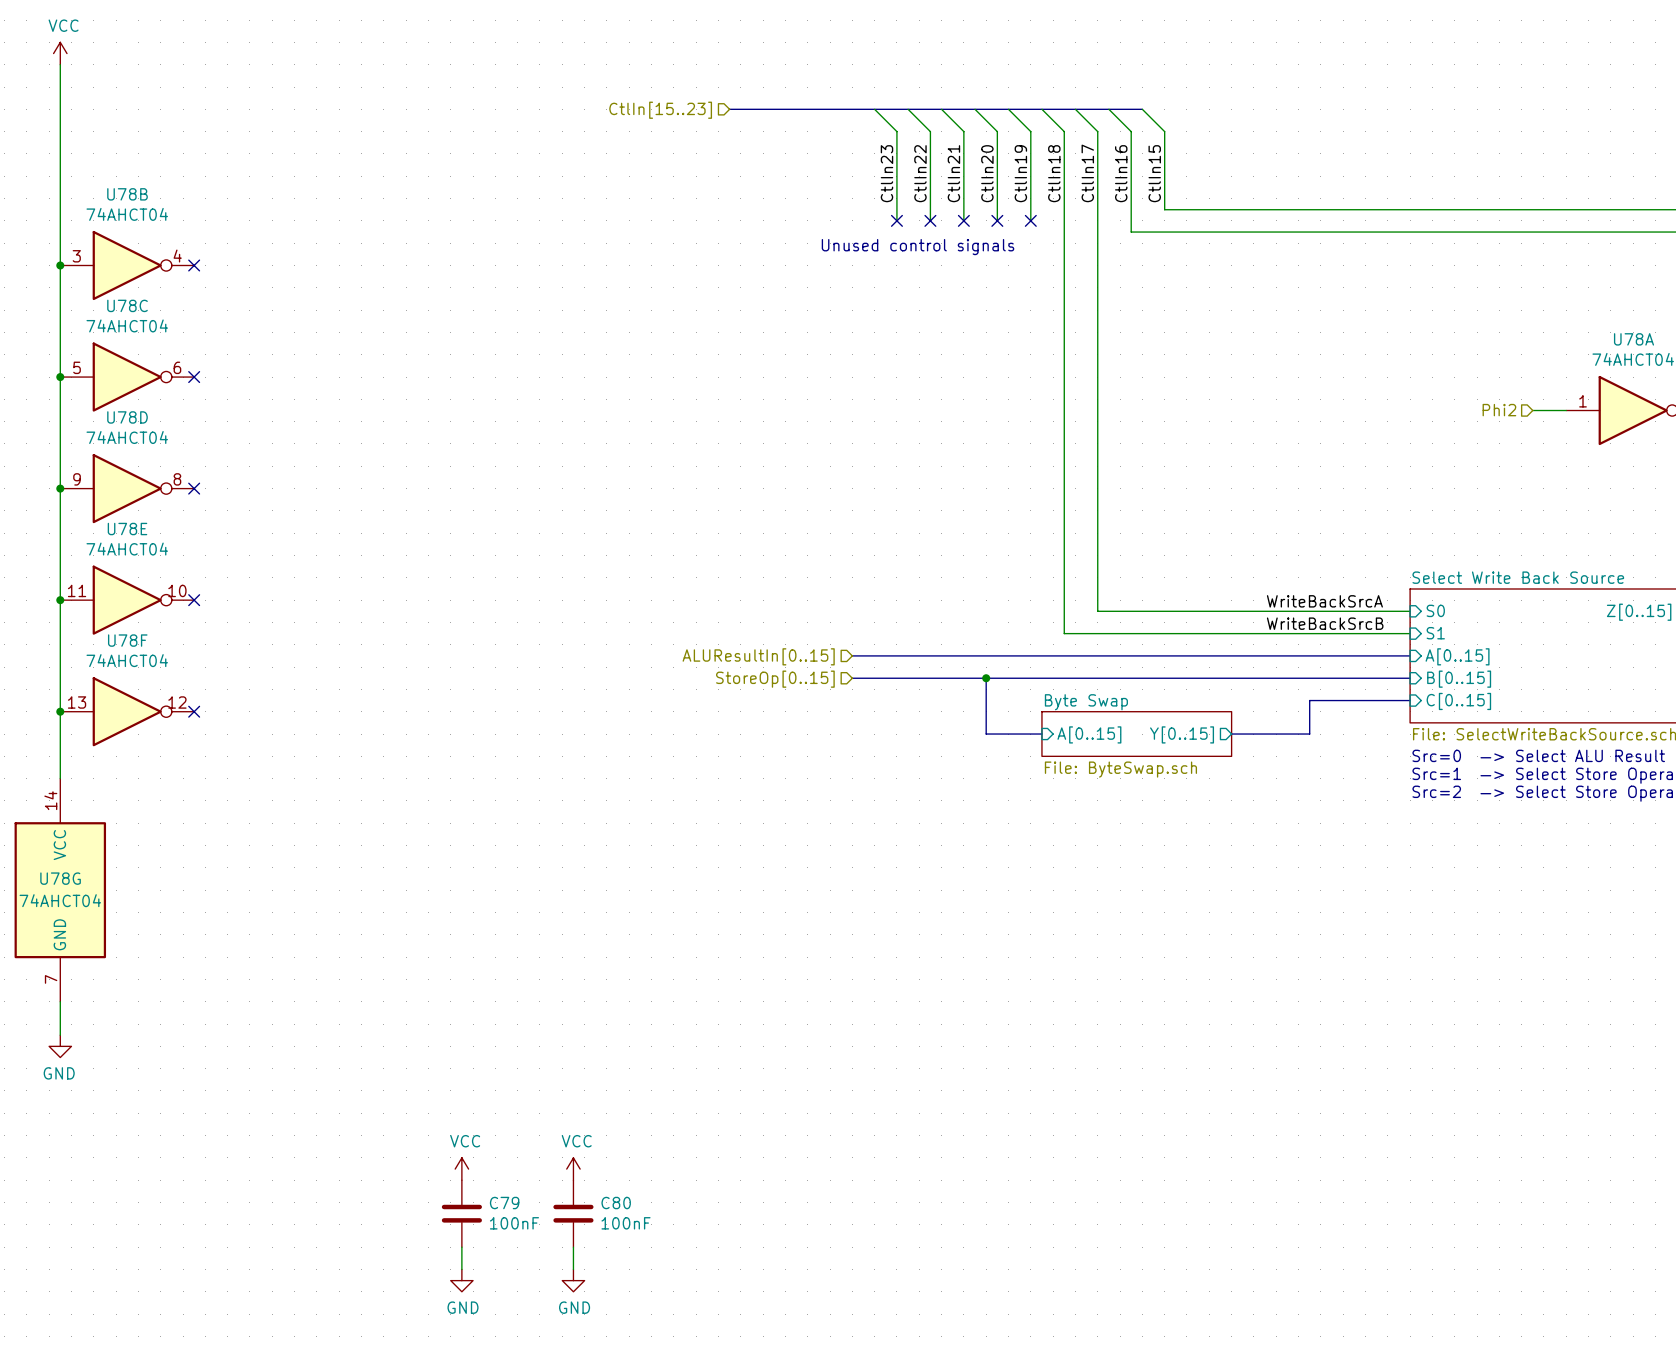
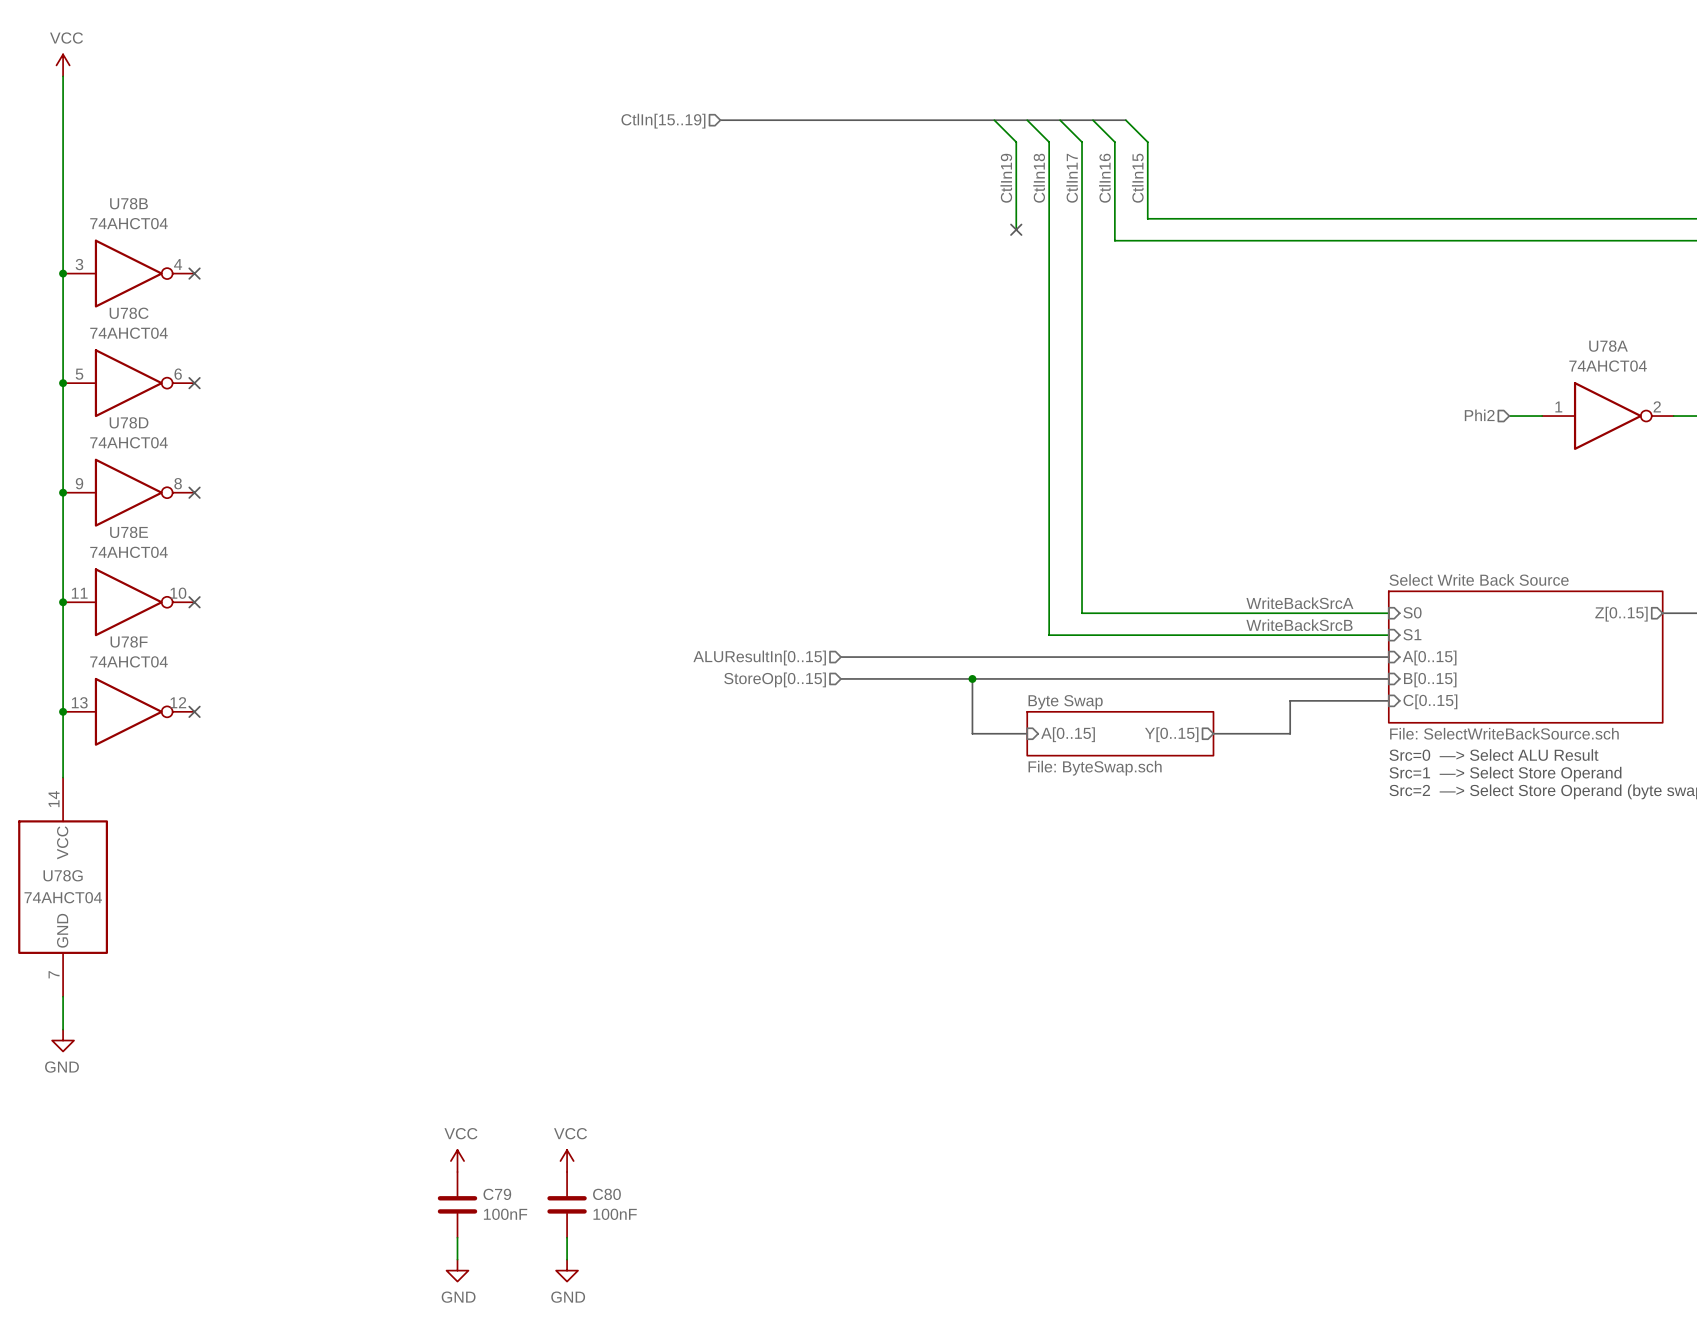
wire: (874, 109) (896, 131) (896, 220) -> none
wire: (908, 109) (930, 131) (930, 220) -> none
wire: (941, 109) (963, 131) (963, 220) -> none
wire: (975, 109) (997, 131) (997, 220) -> none
hierarchical label: CtlIn[15..23] (660, 110) -> CtlIn[15..19] (663, 121)
label: CtlIn23 (886, 173) -> none
label: CtlIn22 (920, 173) -> none
label: CtlIn21 (953, 173) -> none
label: CtlIn20 (987, 173) -> none
no-connect mark: (896, 220) -> none
no-connect mark: (930, 220) -> none
no-connect mark: (963, 220) -> none
no-connect mark: (997, 220) -> none
text: Unused control signals (918, 247) -> none

